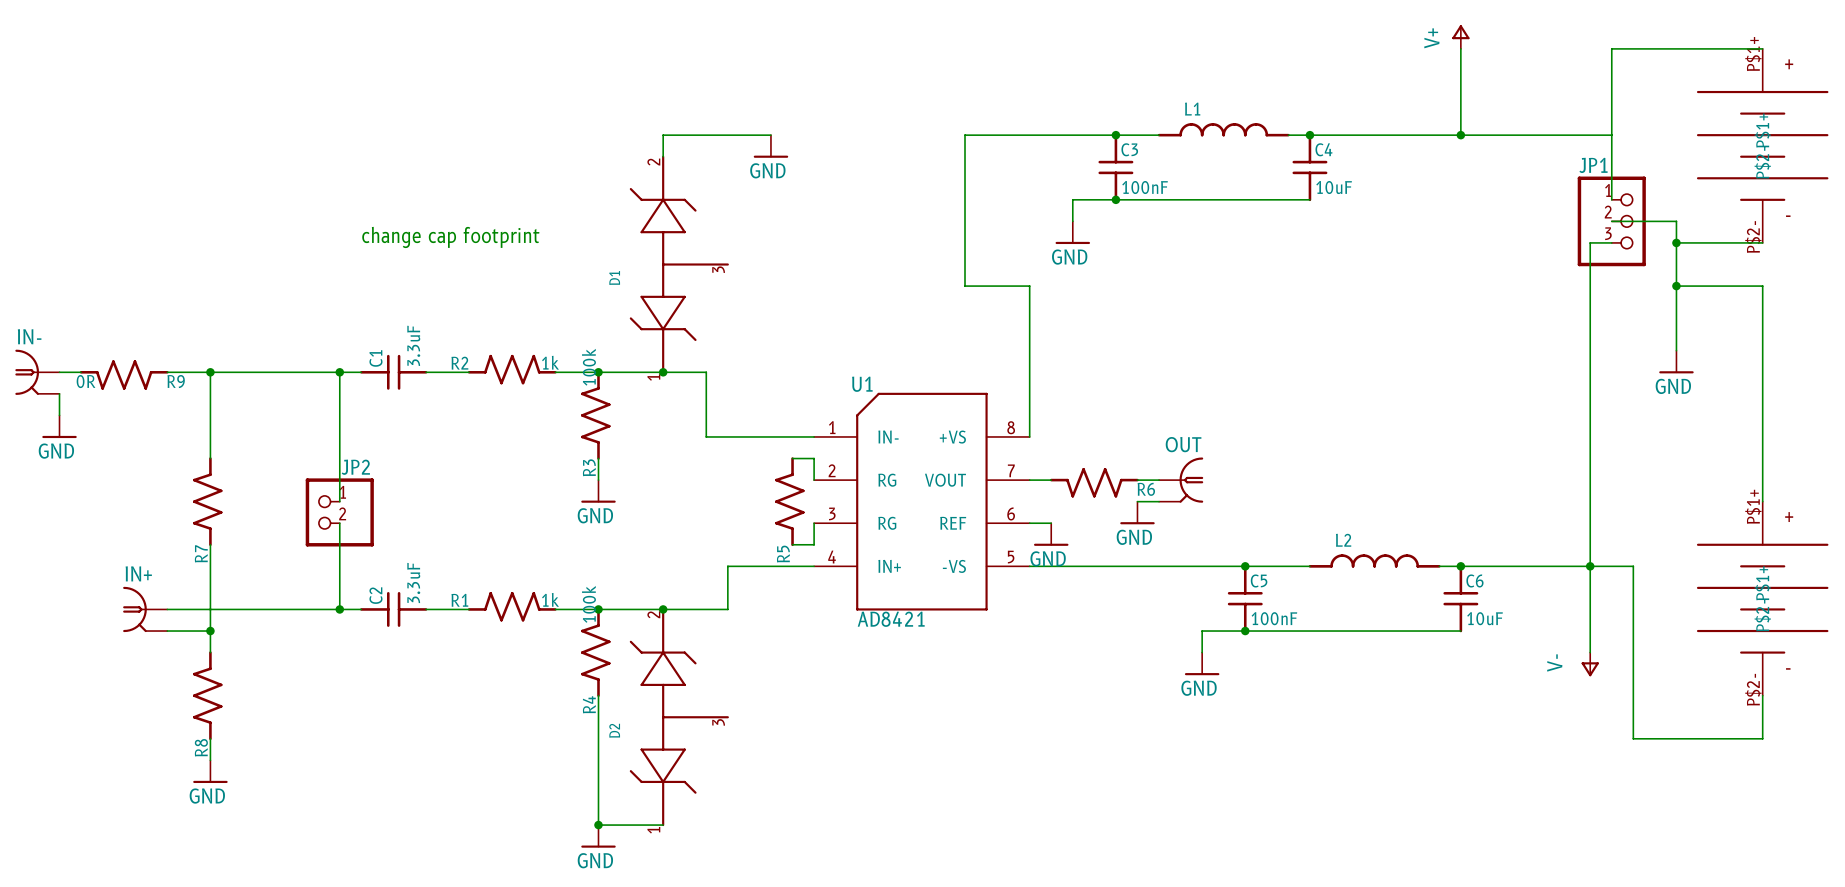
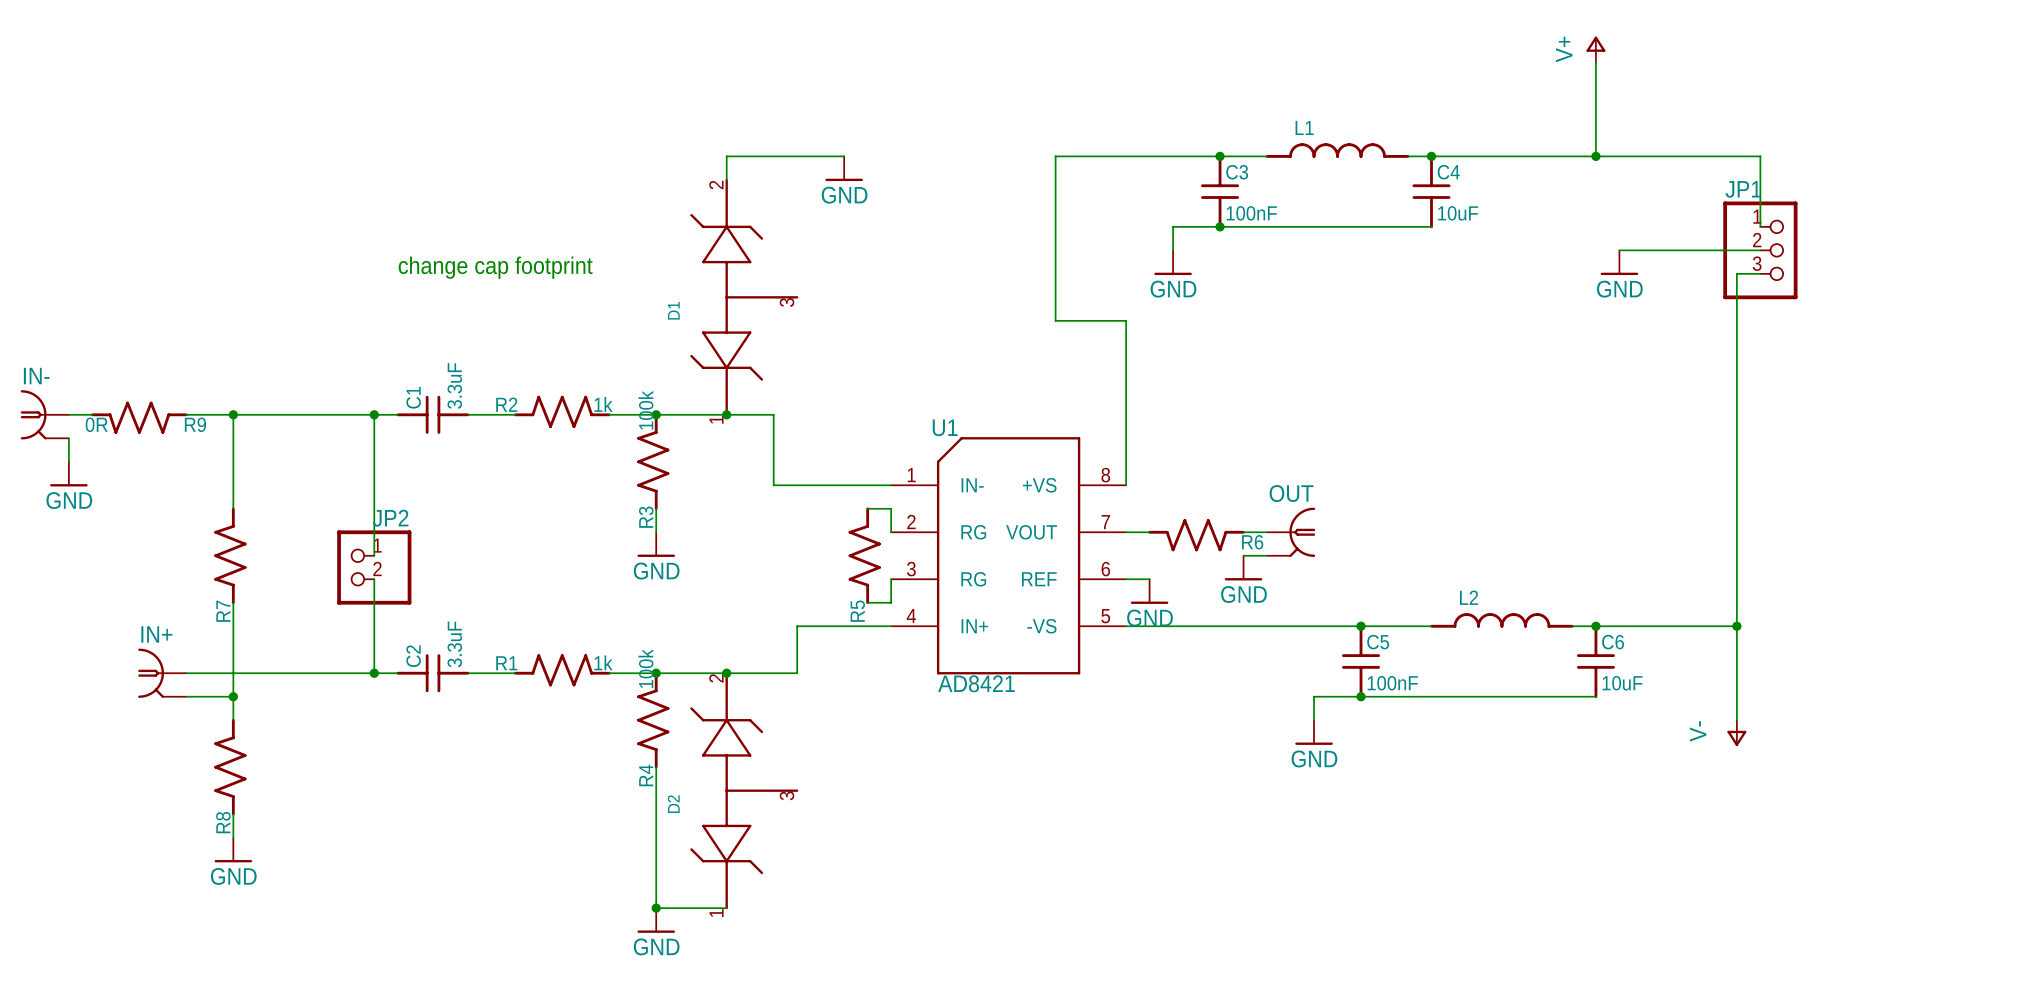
wire: (1762, 48) (1611, 48) (1611, 135) -> none
part: (1762, 145) -> none
wire: (1611, 221) (1676, 221) (1676, 350) -> (1760, 250) (1619, 250)
power symbol: none -> GND (1619, 262)
wire: (1676, 242) (1762, 242) -> none
junction: (1676, 242) -> none
wire: (1676, 286) (1762, 286) (1762, 501) -> none
junction: (1676, 286) -> none
power symbol: GND (1676, 362) -> none
wire: (1590, 566) (1633, 566) (1633, 738) (1762, 738) (1762, 695) -> none
part: (1762, 598) -> none

